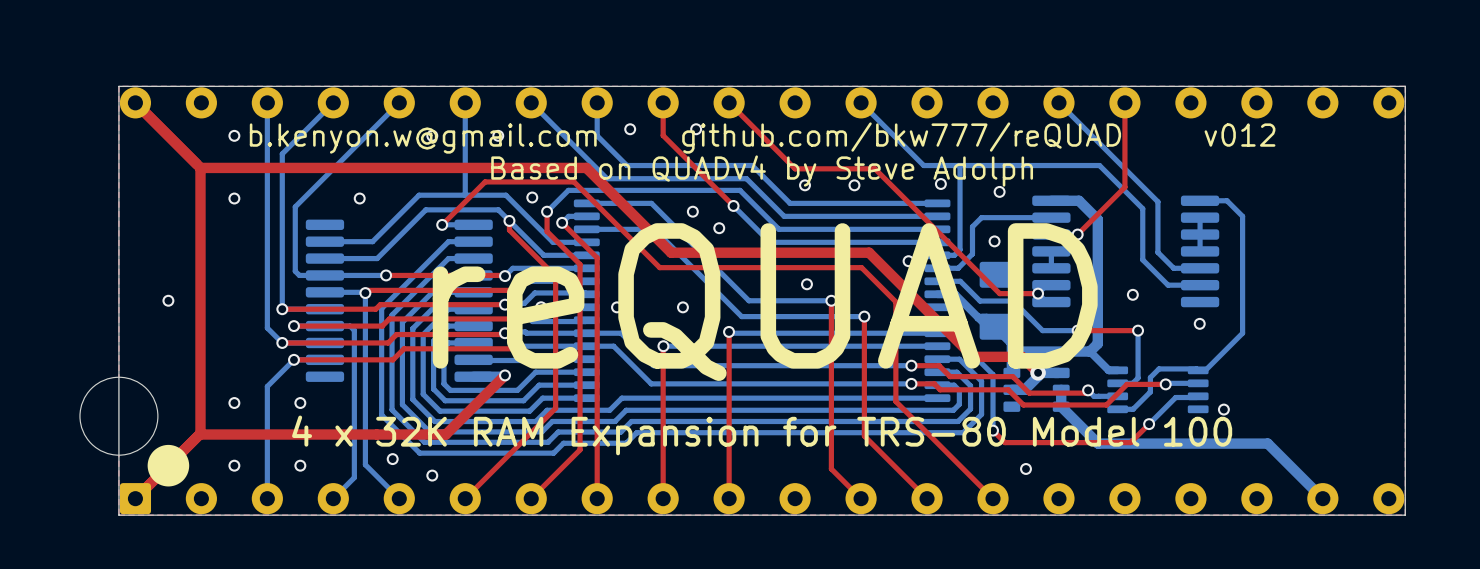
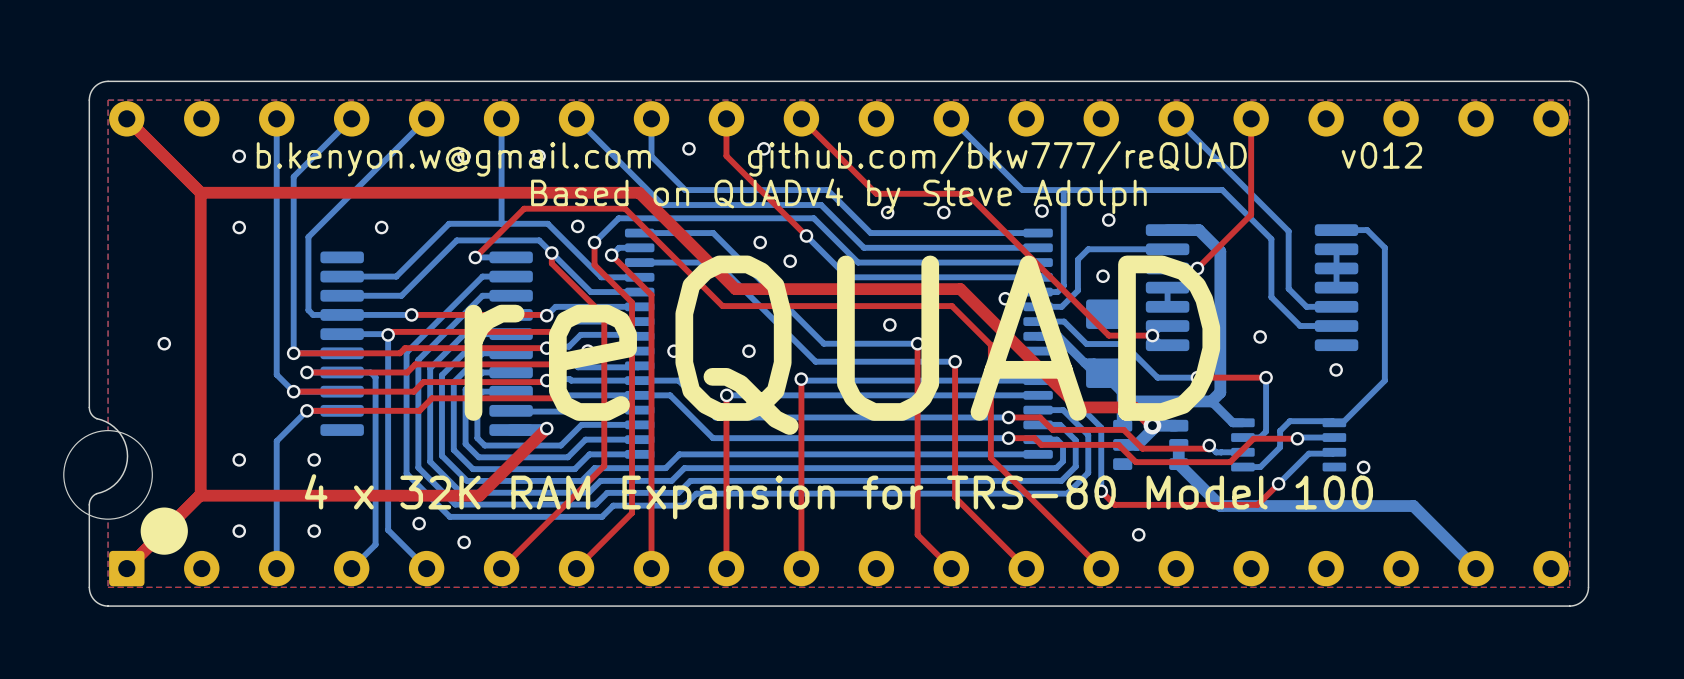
board edge: (118, 86) (1405, 86) (1405, 515) (118, 515) (118, 86) -> (108, 81) (96, 85) (89, 98) (89, 407) (93, 416) (110, 424) (120, 433) (126, 446) (127, 456) (124, 470) (120, 478) (110, 488) (94, 495) (89, 503) (89, 589) (93, 599) (101, 605) (1569, 606) (1581, 601) (1587, 593) (1588, 100) (1584, 88) (1575, 82) (108, 81)

